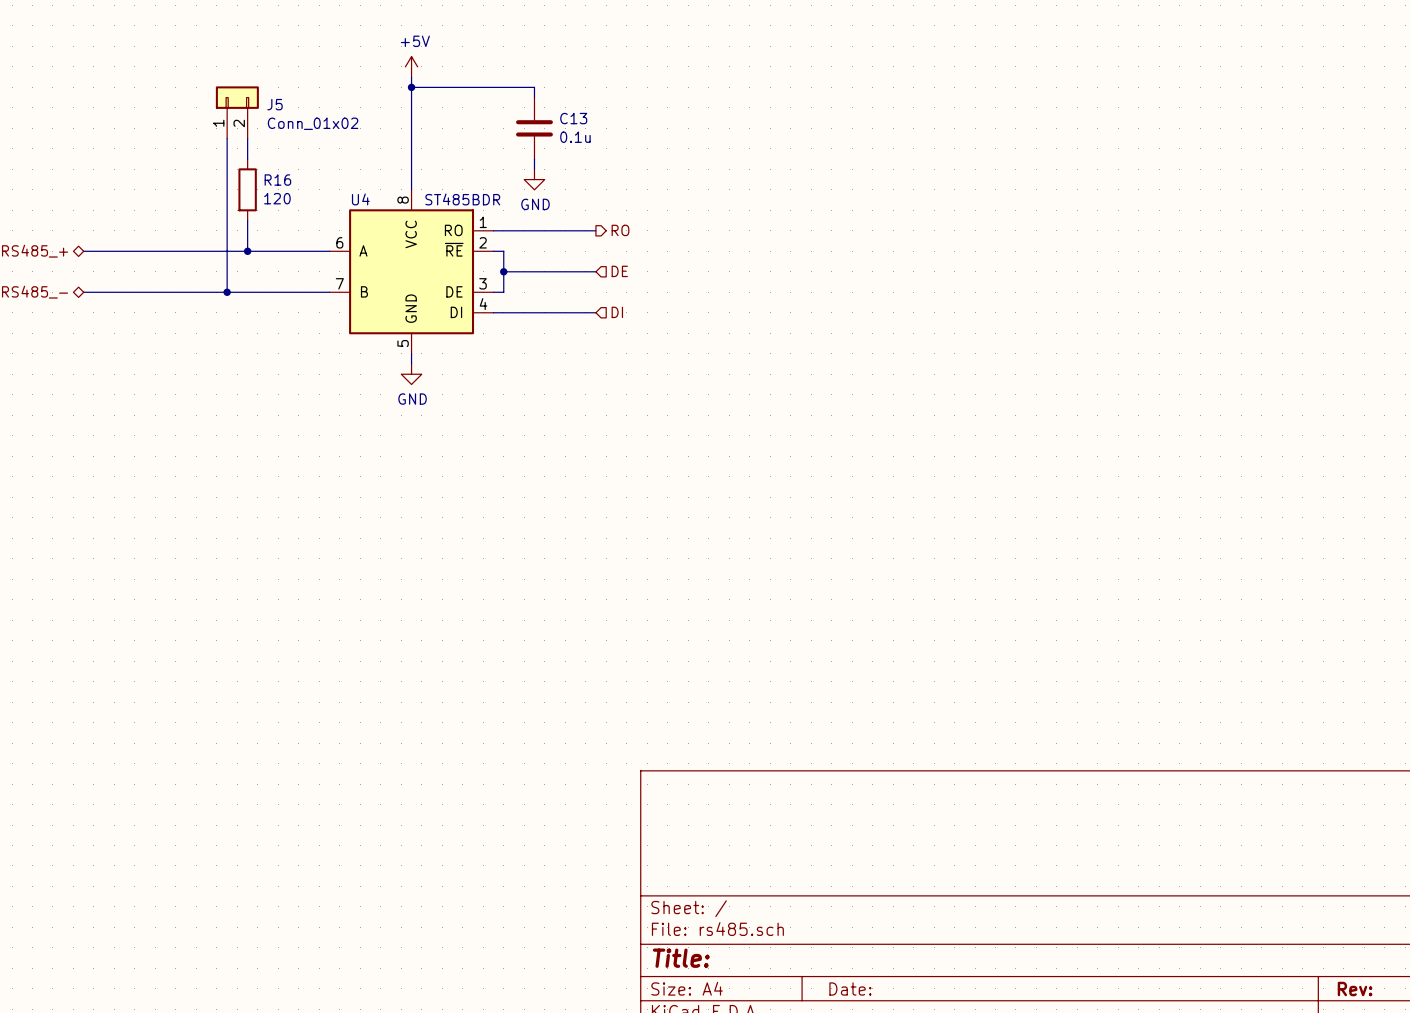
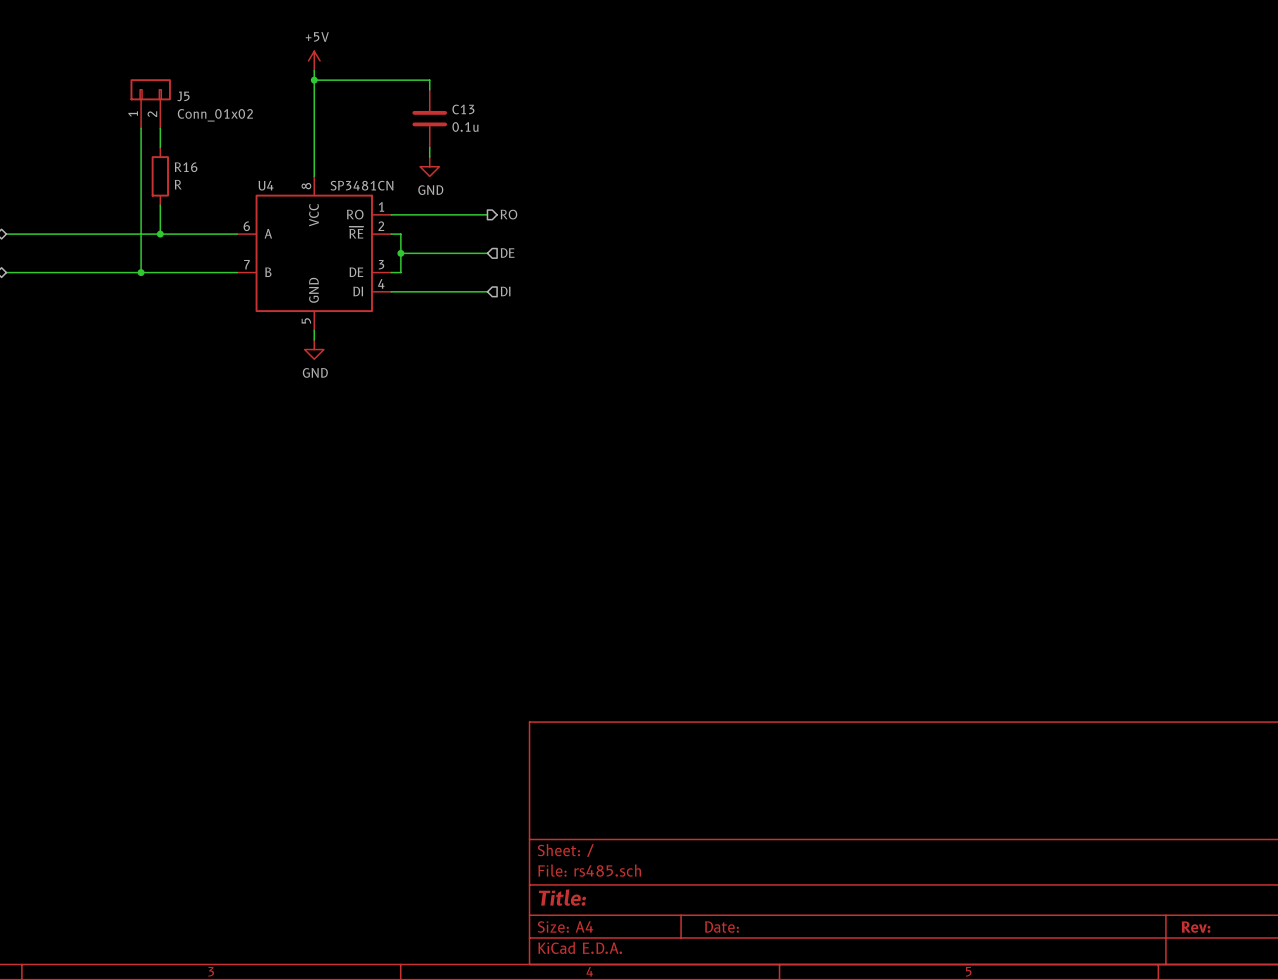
R16 value: 120 (277, 198) -> R (178, 184)
U4 value: ST485BDR (462, 199) -> SP3481CN (361, 185)

